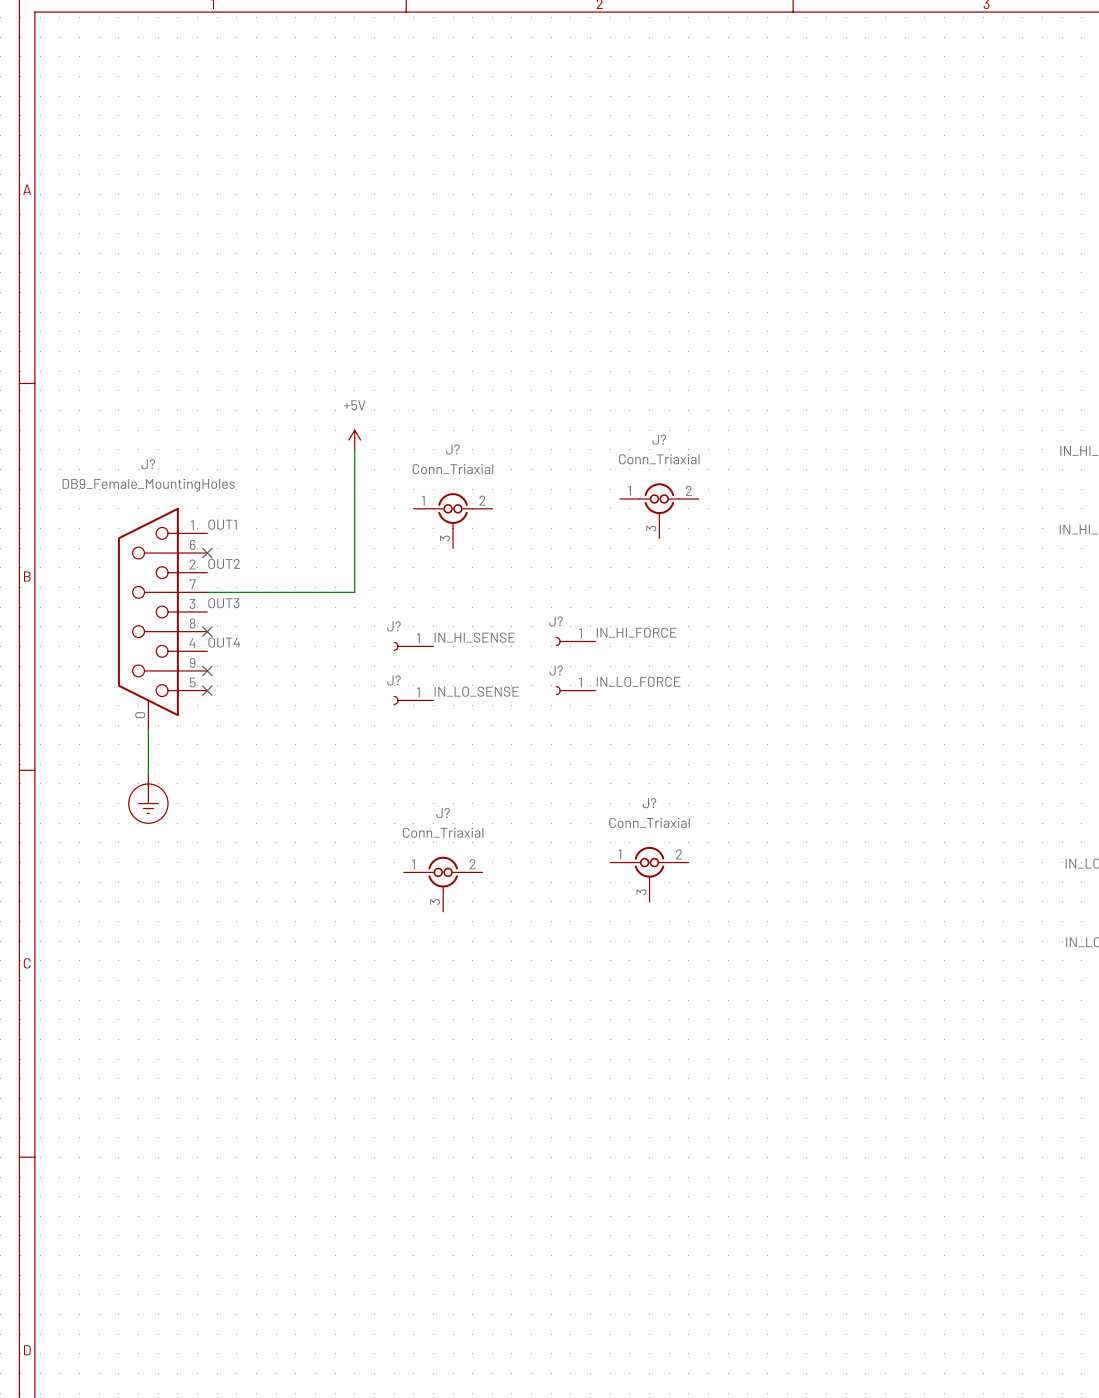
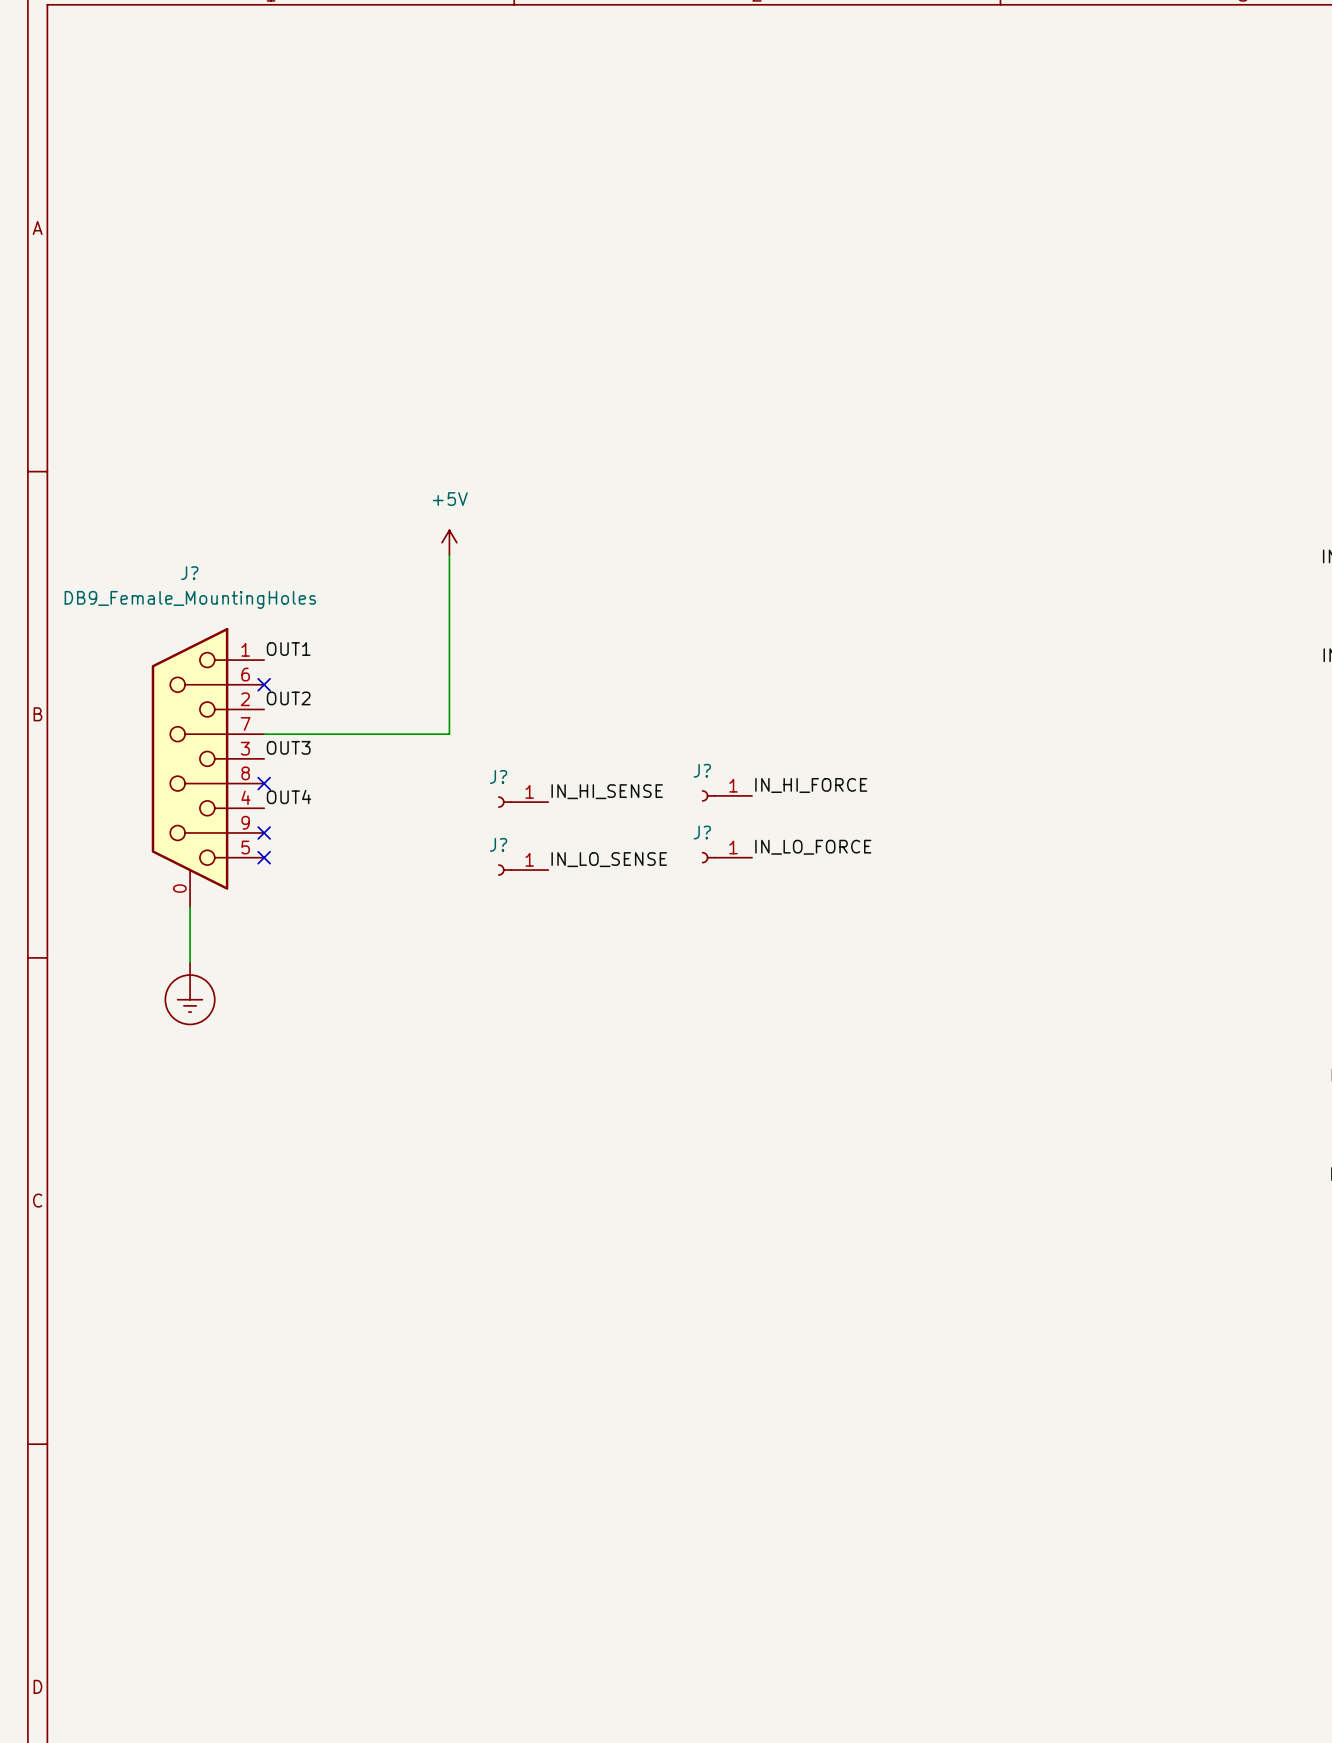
J?: Conn_Triaxial (659, 510) -> none
J?: Conn_Triaxial (453, 520) -> none
J?: Conn_Triaxial (649, 874) -> none
J?: Conn_Triaxial (443, 884) -> none

